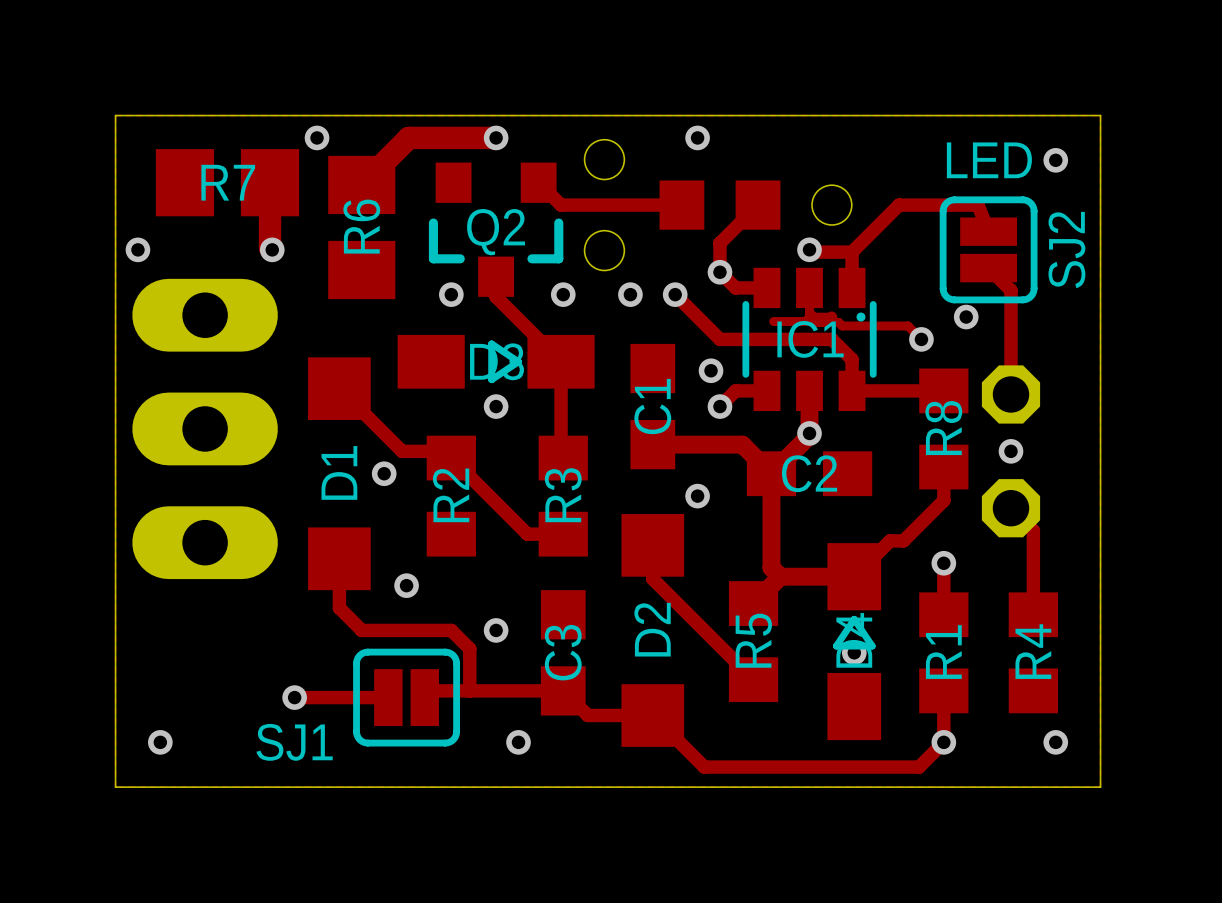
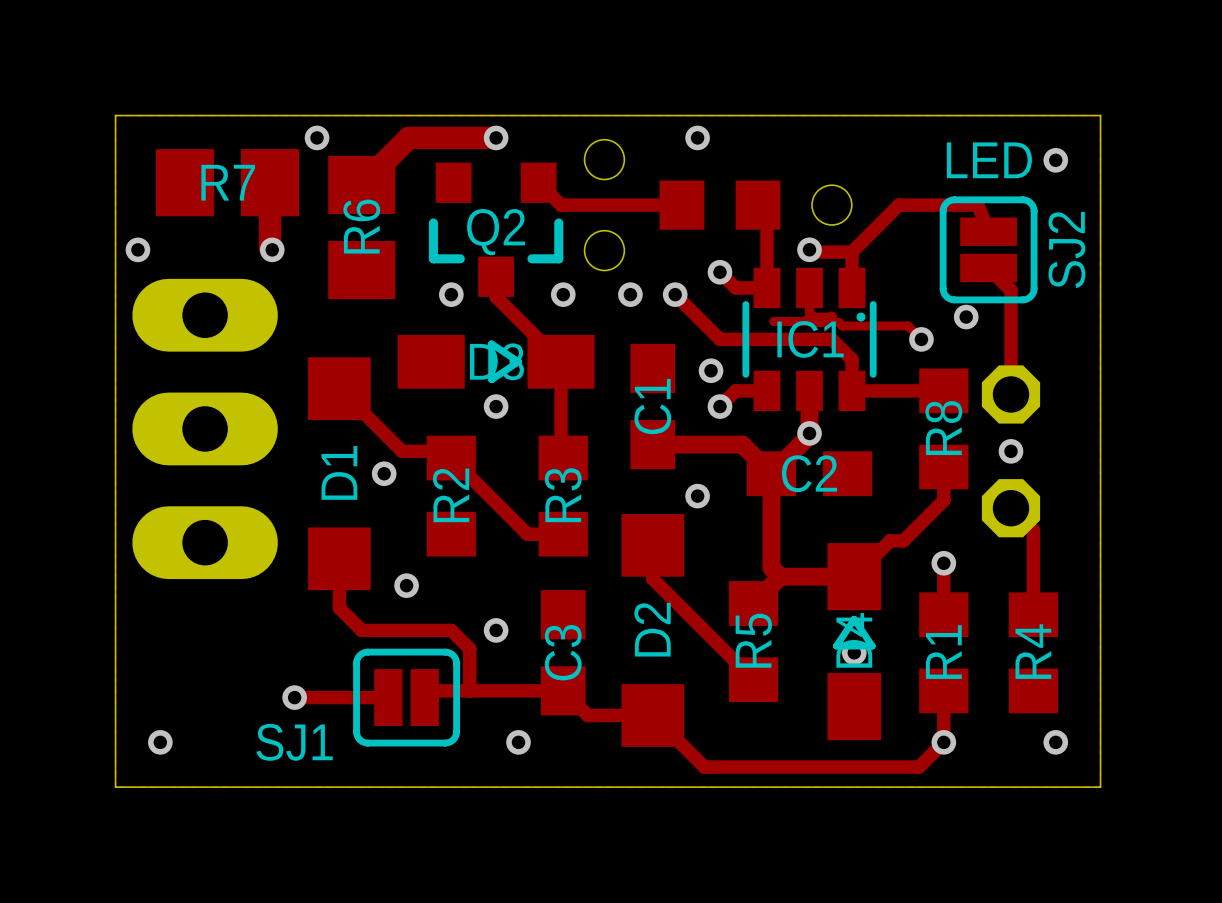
track: (758, 205) (719, 243) (719, 272) -> (758, 205) (766, 214) (766, 287)

